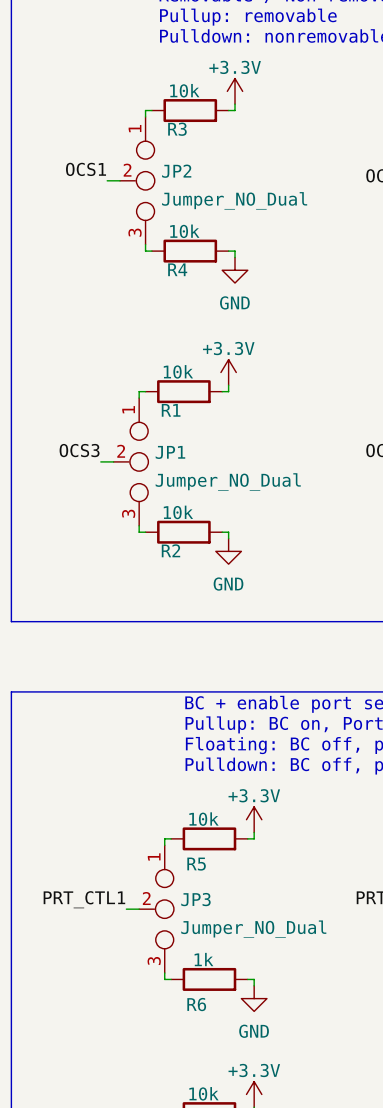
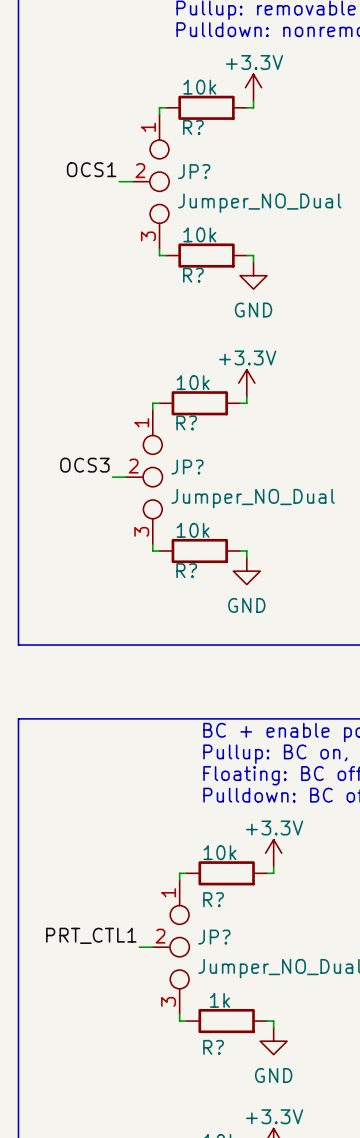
R3 name: R3 (177, 129) -> R? (193, 127)
JP2 name: JP2 (176, 171) -> JP? (194, 171)
R4 name: R4 (177, 269) -> R? (193, 275)
R1 name: R1 (171, 410) -> R? (186, 422)
JP1 name: JP1 (170, 452) -> JP? (187, 467)
R2 name: R2 (170, 550) -> R? (186, 570)
R5 name: R5 (196, 864) -> R? (213, 899)
JP3 name: JP3 (195, 899) -> JP? (214, 937)
R6 name: R6 (196, 1004) -> R? (213, 1047)

